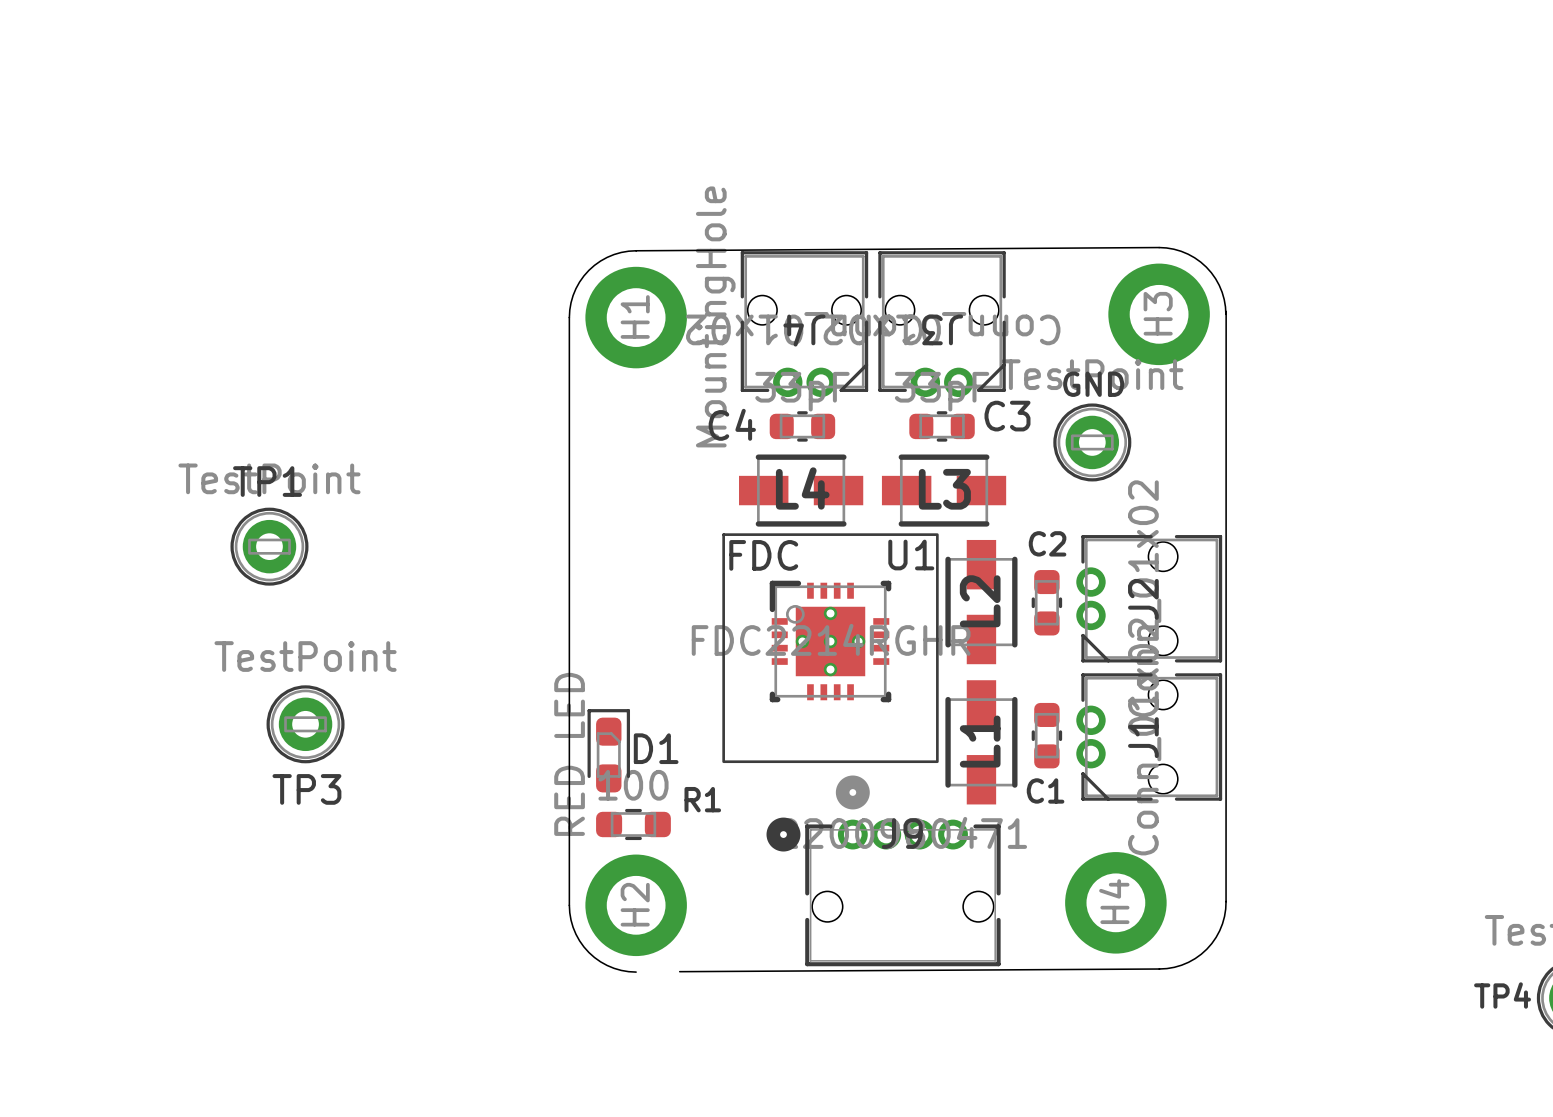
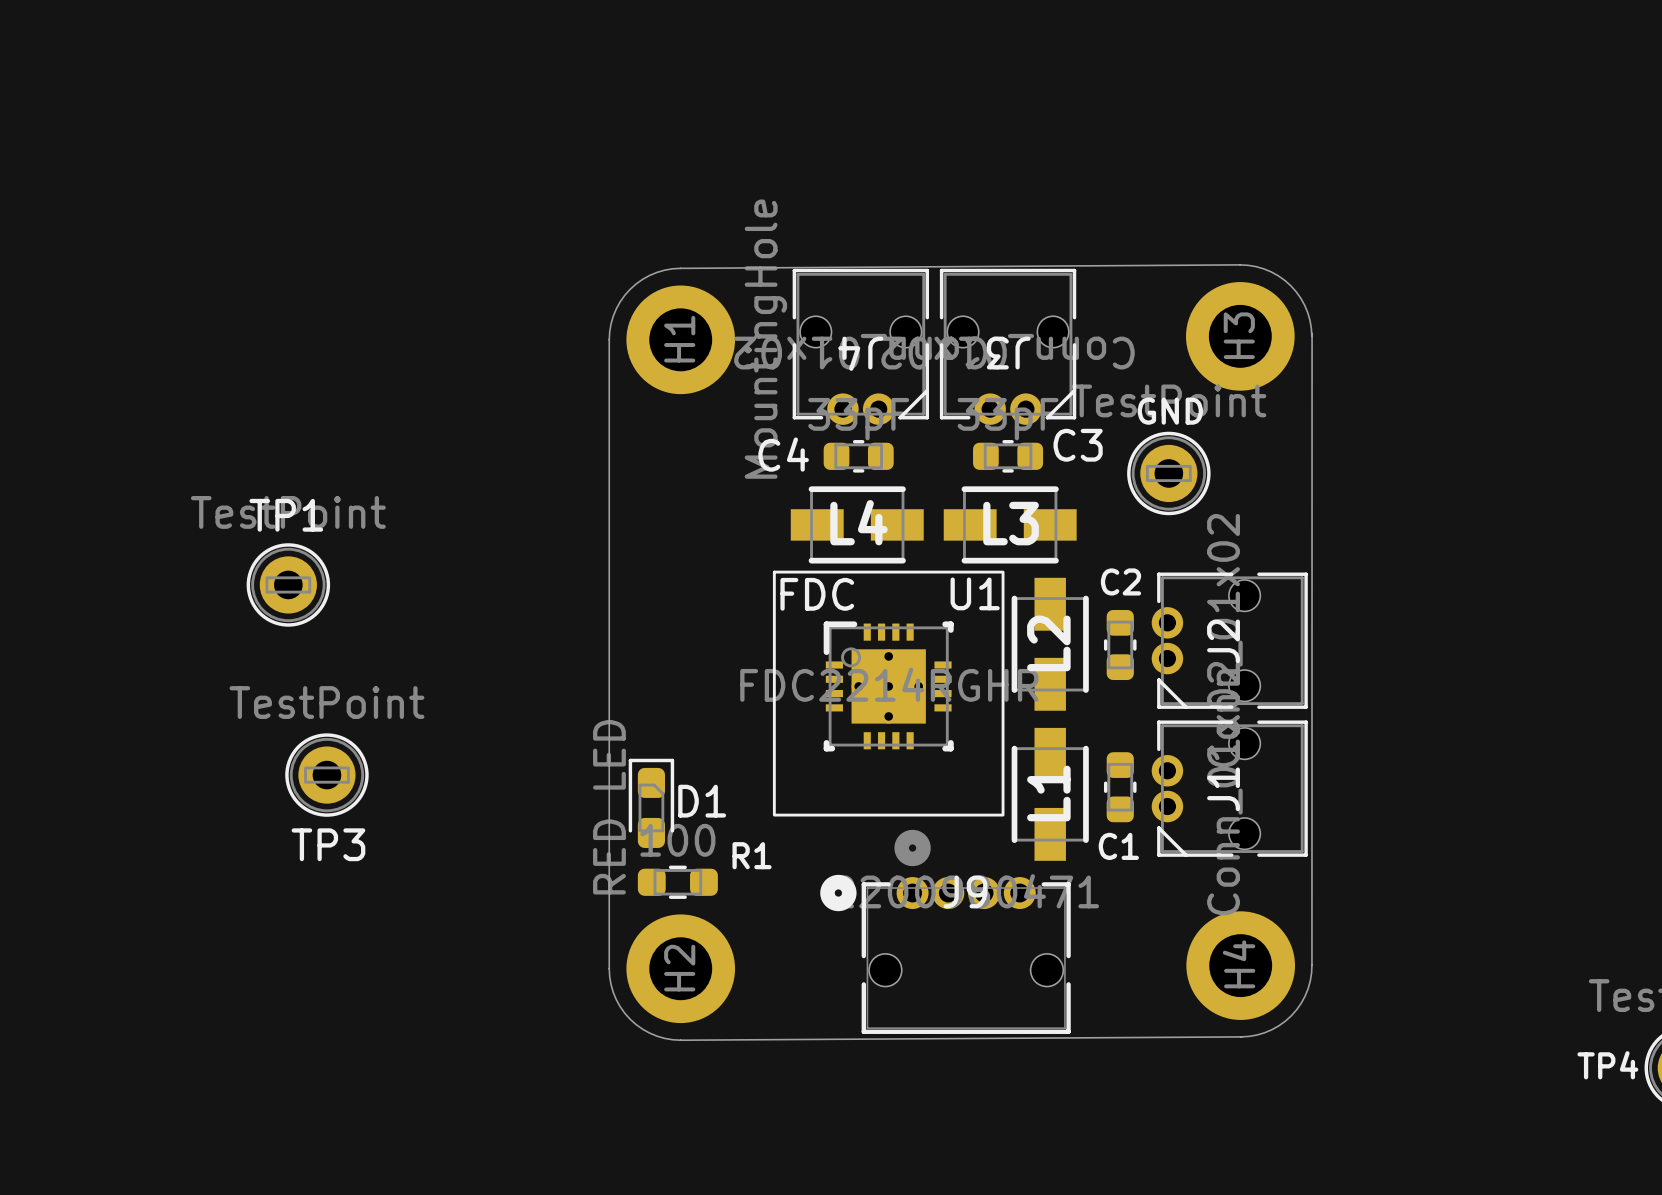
H4 position: (1115, 902) -> (1240, 965)
board edge: (1159, 969) (679, 971) -> (1241, 1036) (680, 1040)

